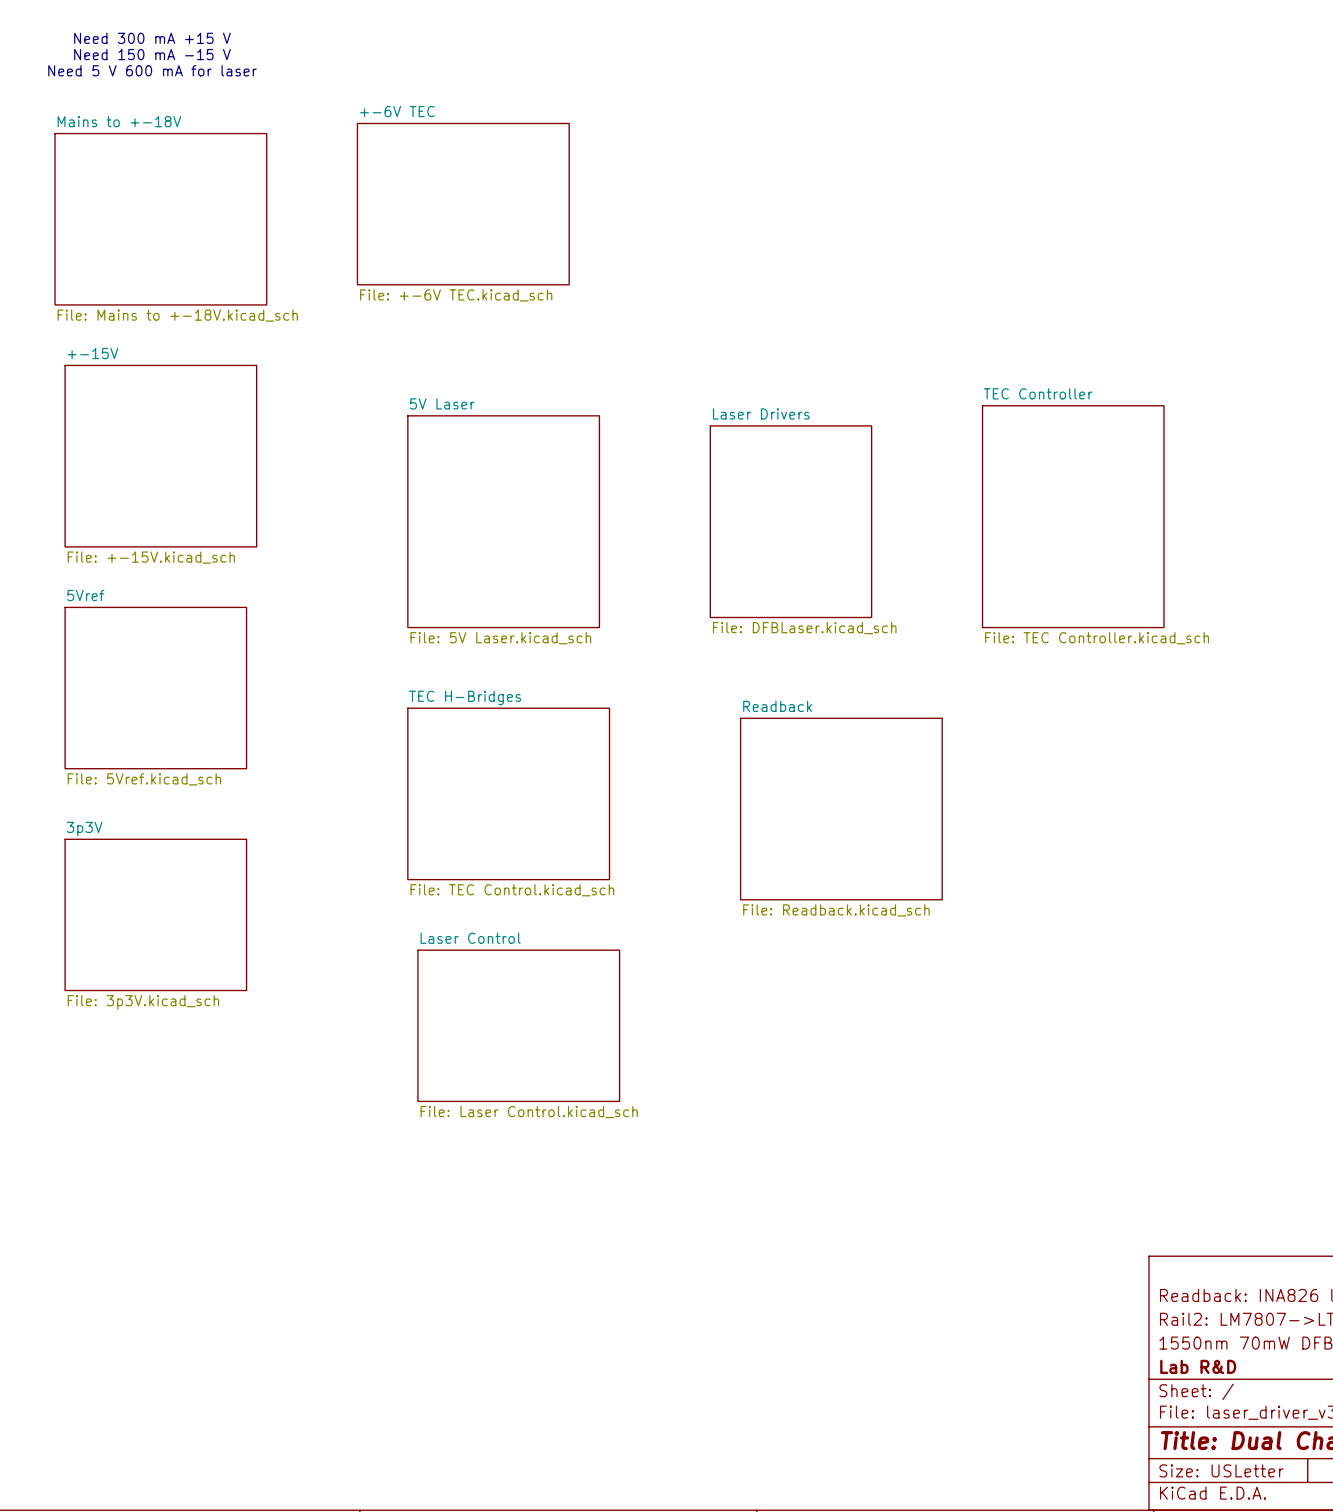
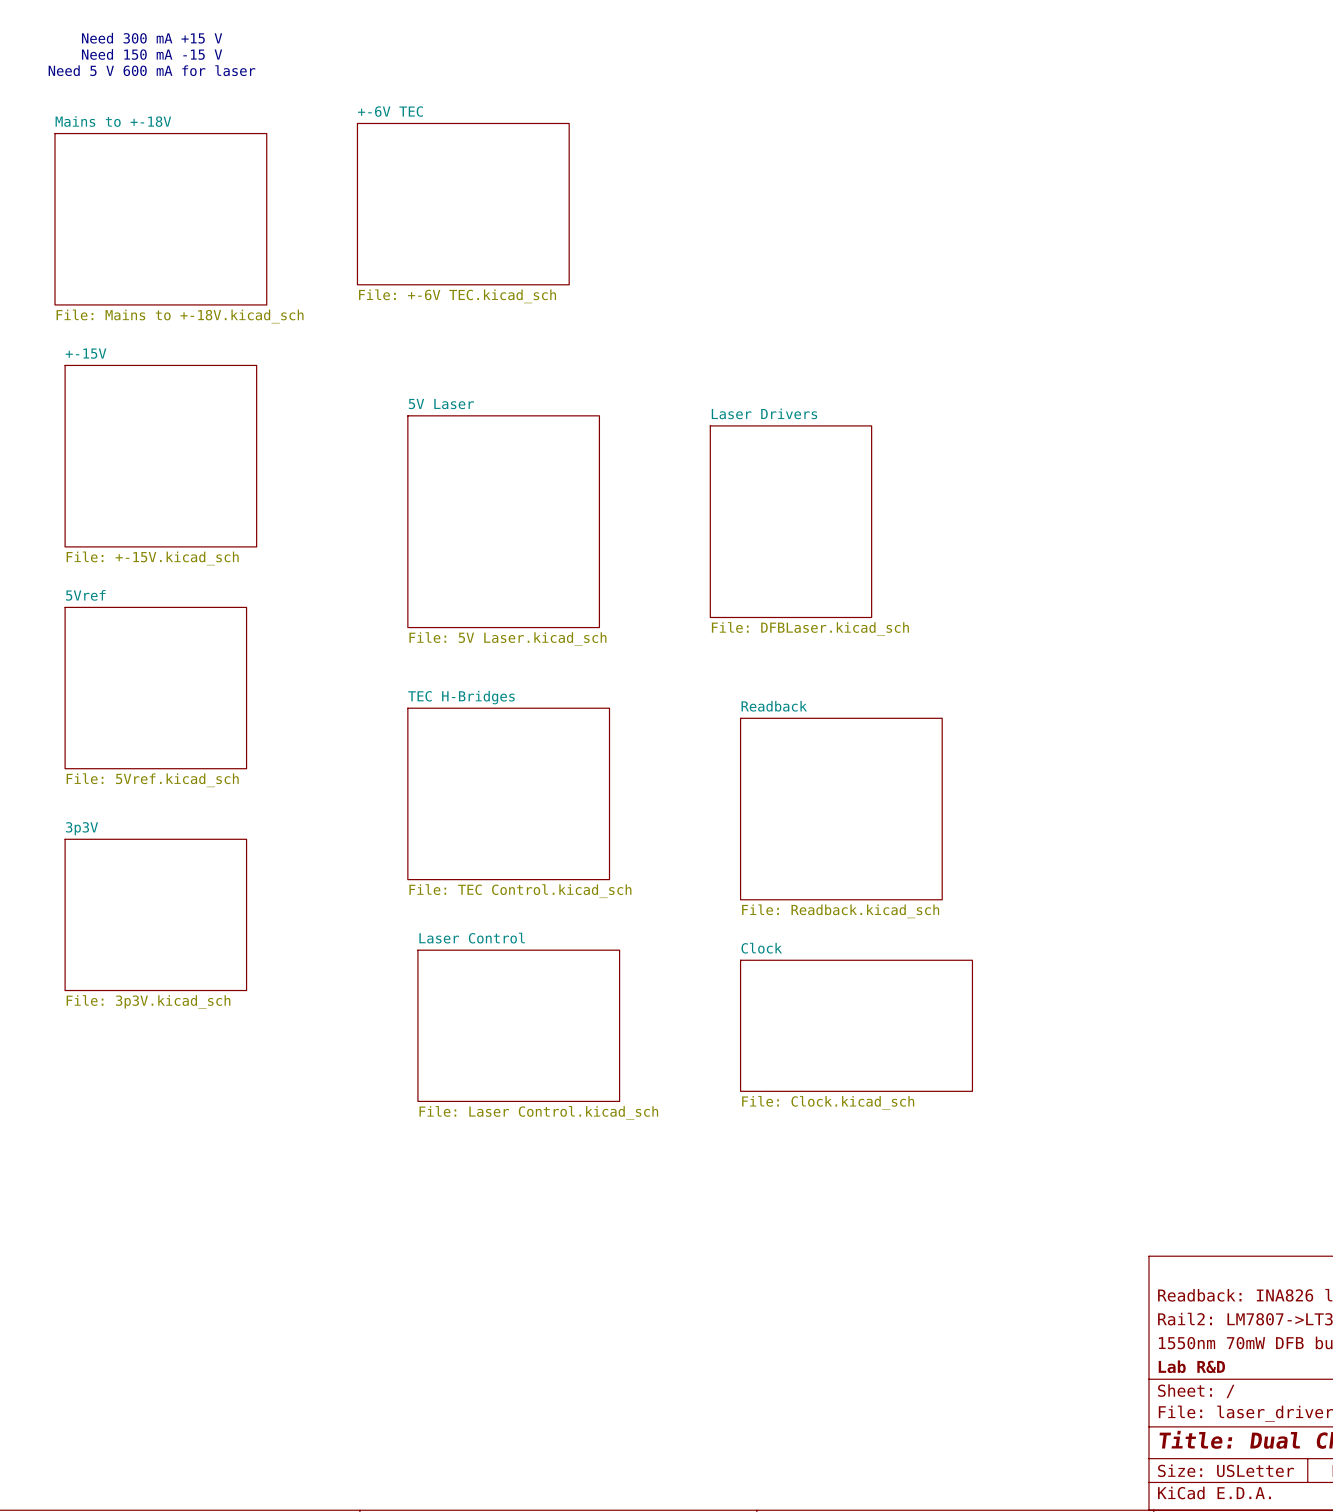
sheet TEC Controller: File: TEC Controller.kicad_sch (1073, 516) -> none
sheet Clock: none -> File: Clock.kicad_sch (856, 1025)

